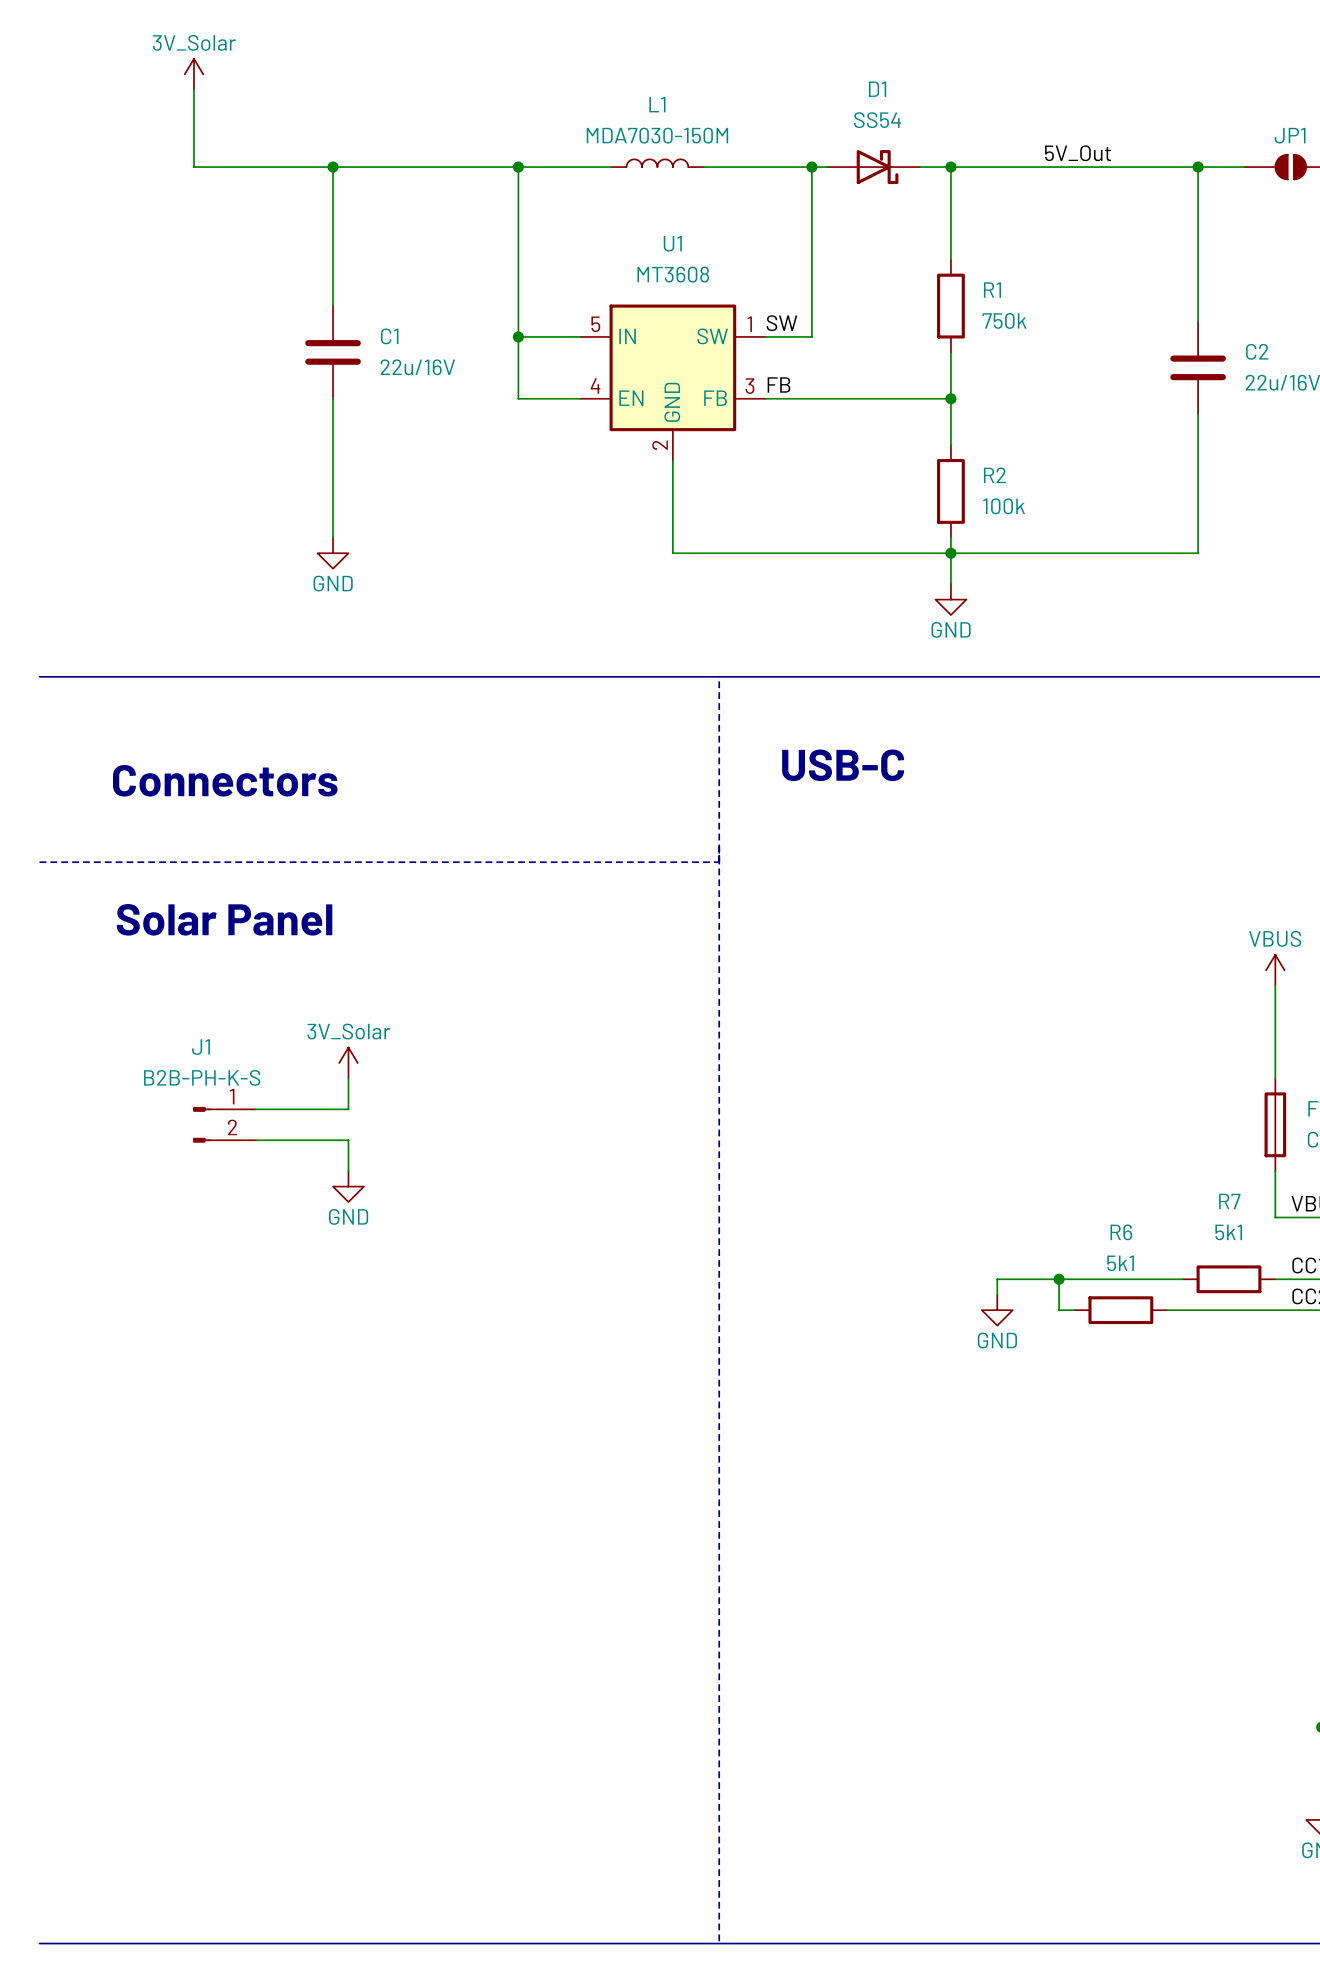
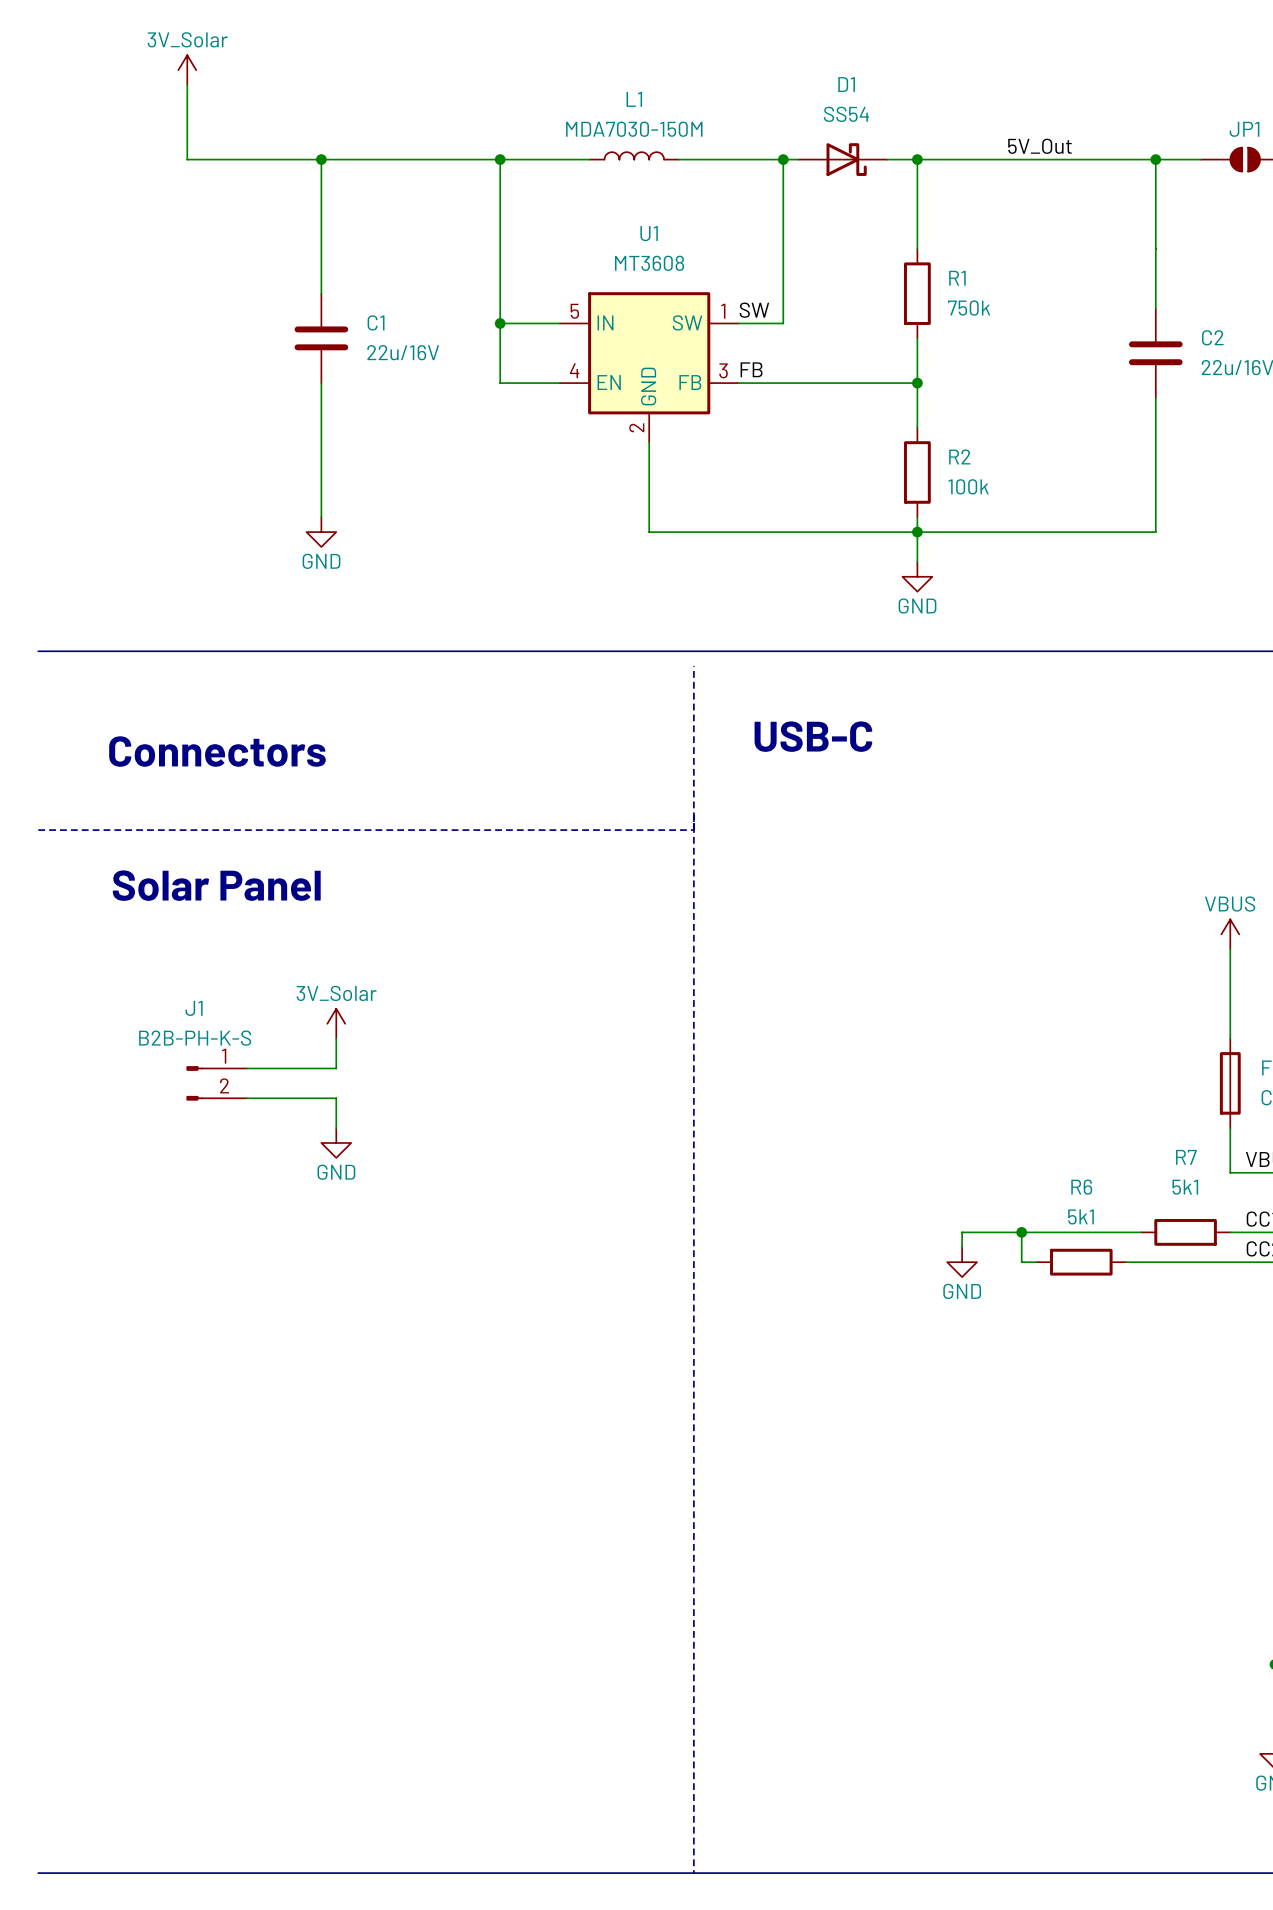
line: (719, 676) (719, 692) -> none

